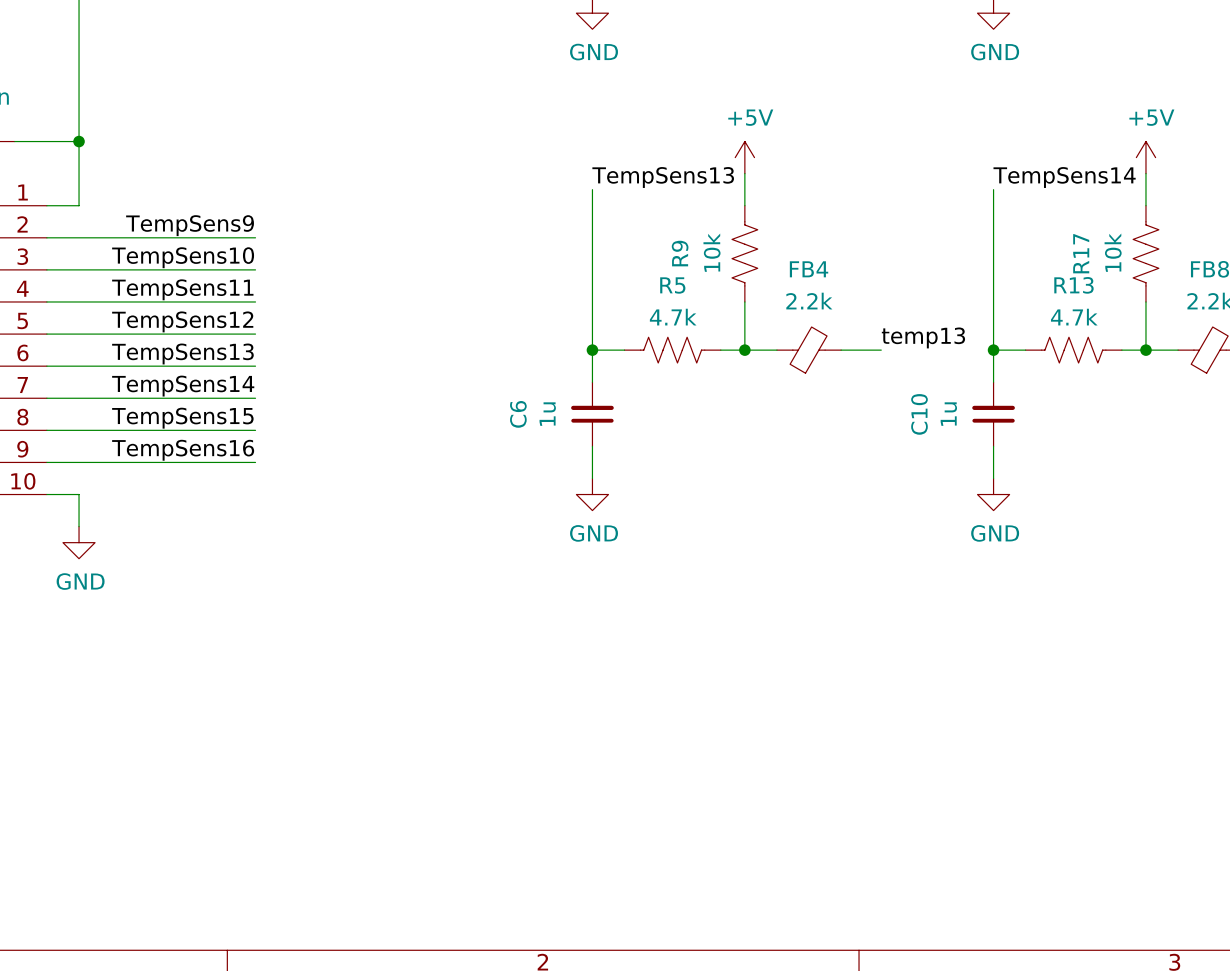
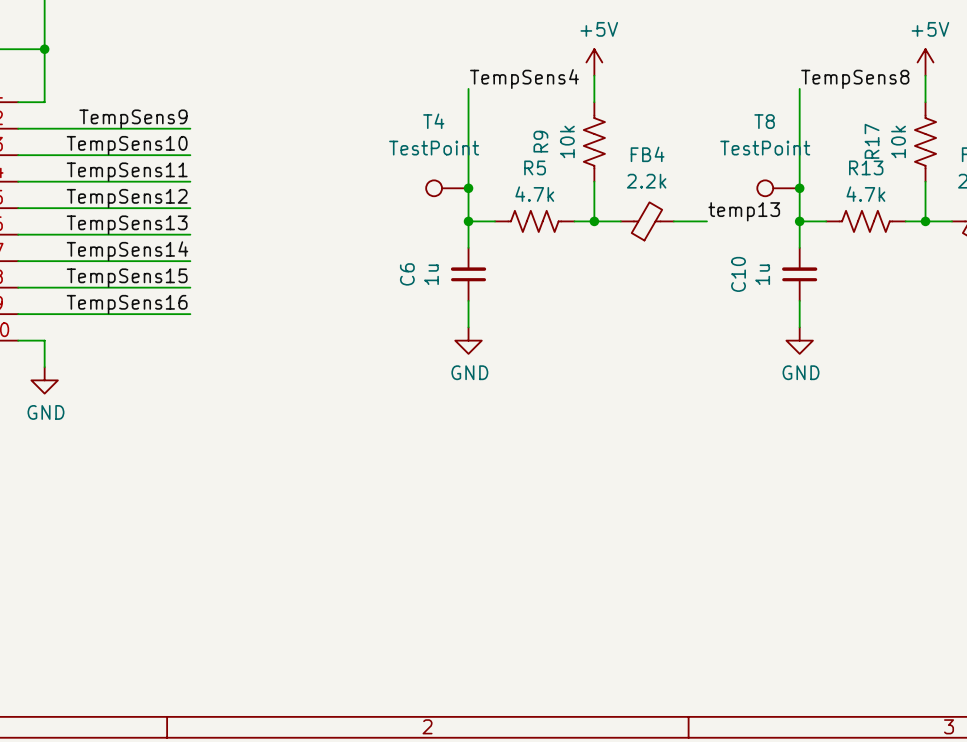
label: TempSens13 (663, 177) -> TempSens4 (524, 79)
label: TempSens14 (1064, 177) -> TempSens8 (855, 79)
T4: none -> TestPoint (447, 188)
junction: none -> (468, 188)
T8: none -> TestPoint (778, 188)
junction: none -> (799, 188)

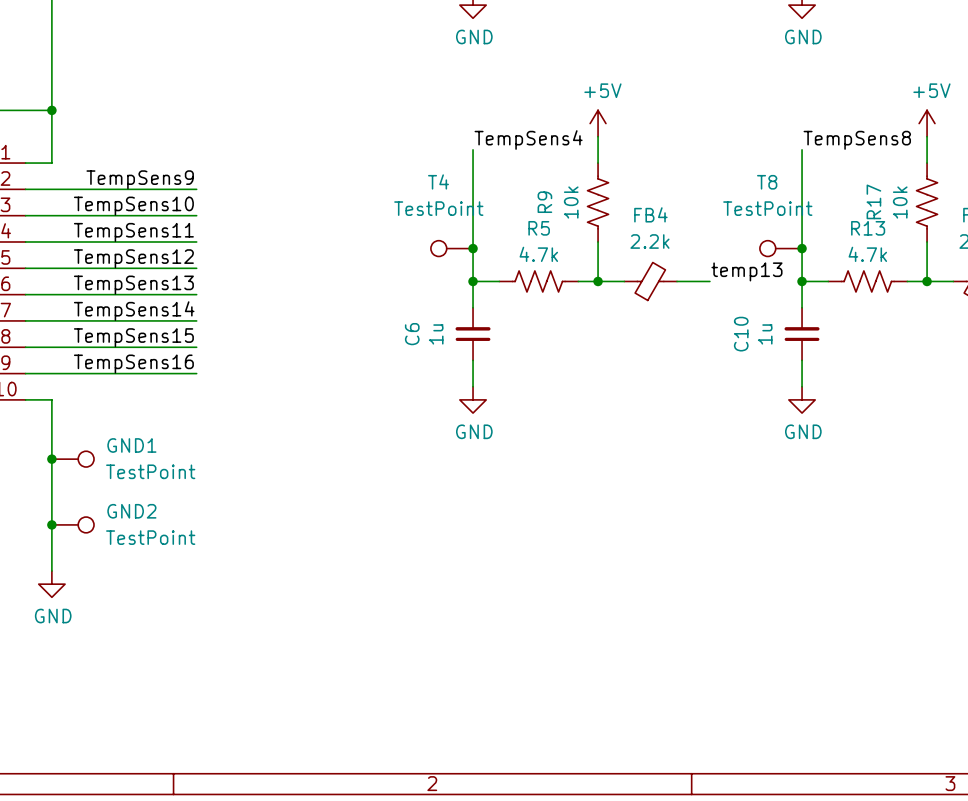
wire: none -> (51, 426) (51, 571)
power symbol position: GND (44, 380) -> GND (51, 584)
junction: none -> (51, 459)
GND1: none -> TestPoint (72, 459)
junction: none -> (51, 524)
GND2: none -> TestPoint (72, 524)

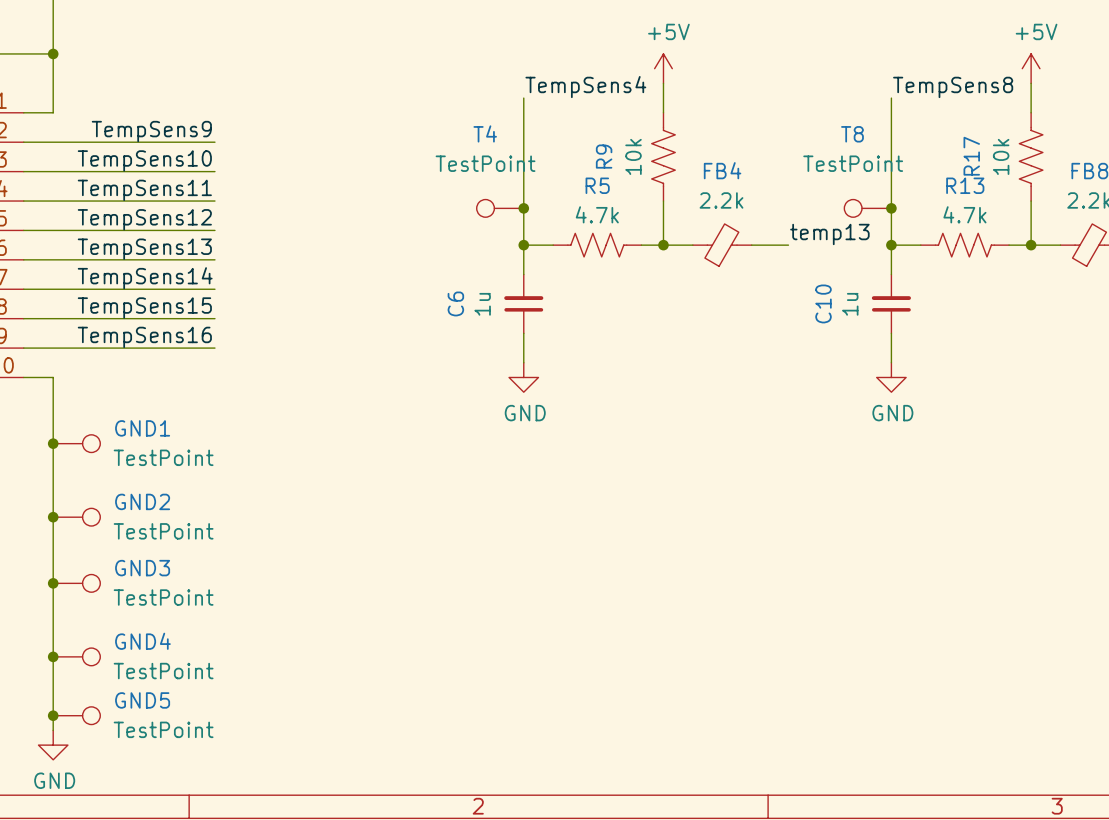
wire: none -> (53, 568) (53, 730)
power symbol position: GND (51, 584) -> GND (53, 745)
junction: none -> (53, 583)
GND3: none -> TestPoint (76, 583)
junction: none -> (53, 656)
GND4: none -> TestPoint (76, 656)
junction: none -> (53, 715)
GND5: none -> TestPoint (76, 715)

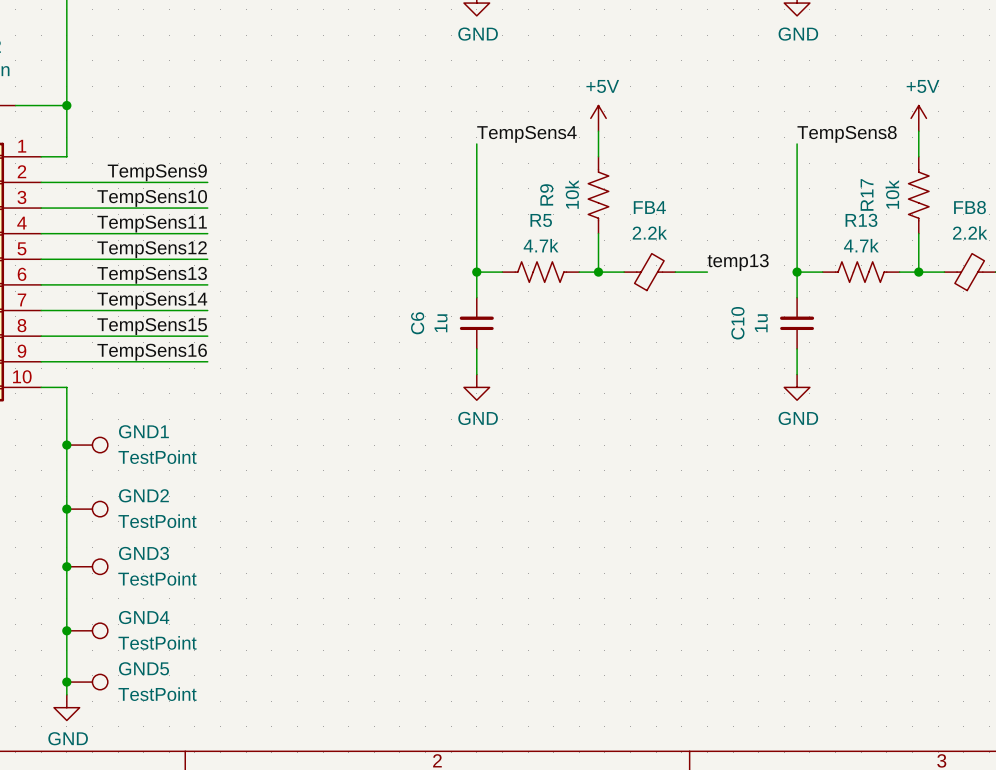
T4: TestPoint (500, 208) -> none
junction: (523, 208) -> none
T8: TestPoint (867, 208) -> none
junction: (891, 208) -> none

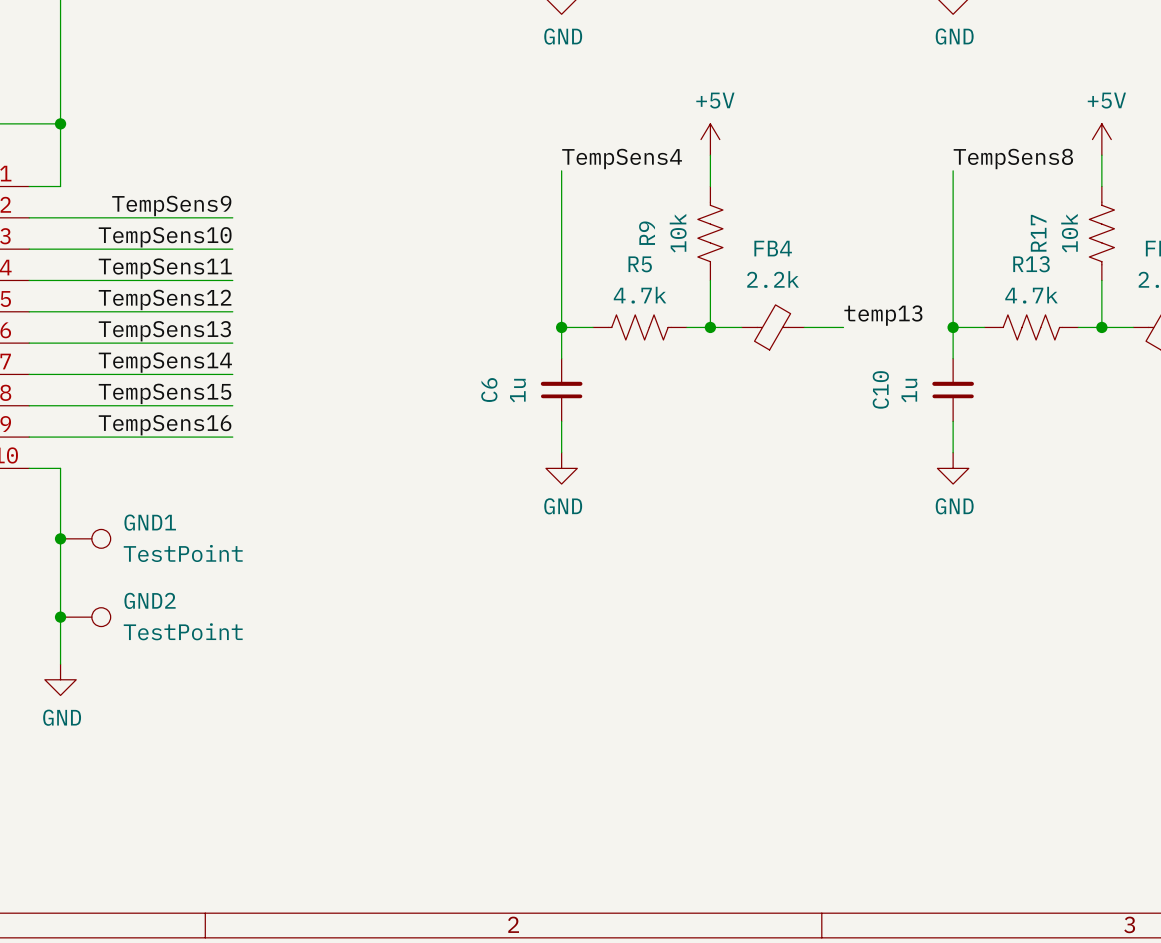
wire: (66, 547) (66, 694) -> none
junction: (66, 566) -> none
GND3: TestPoint (87, 566) -> none
junction: (66, 630) -> none
GND4: TestPoint (87, 630) -> none
junction: (66, 682) -> none
GND5: TestPoint (87, 682) -> none
power symbol position: GND (66, 707) -> GND (60, 679)

